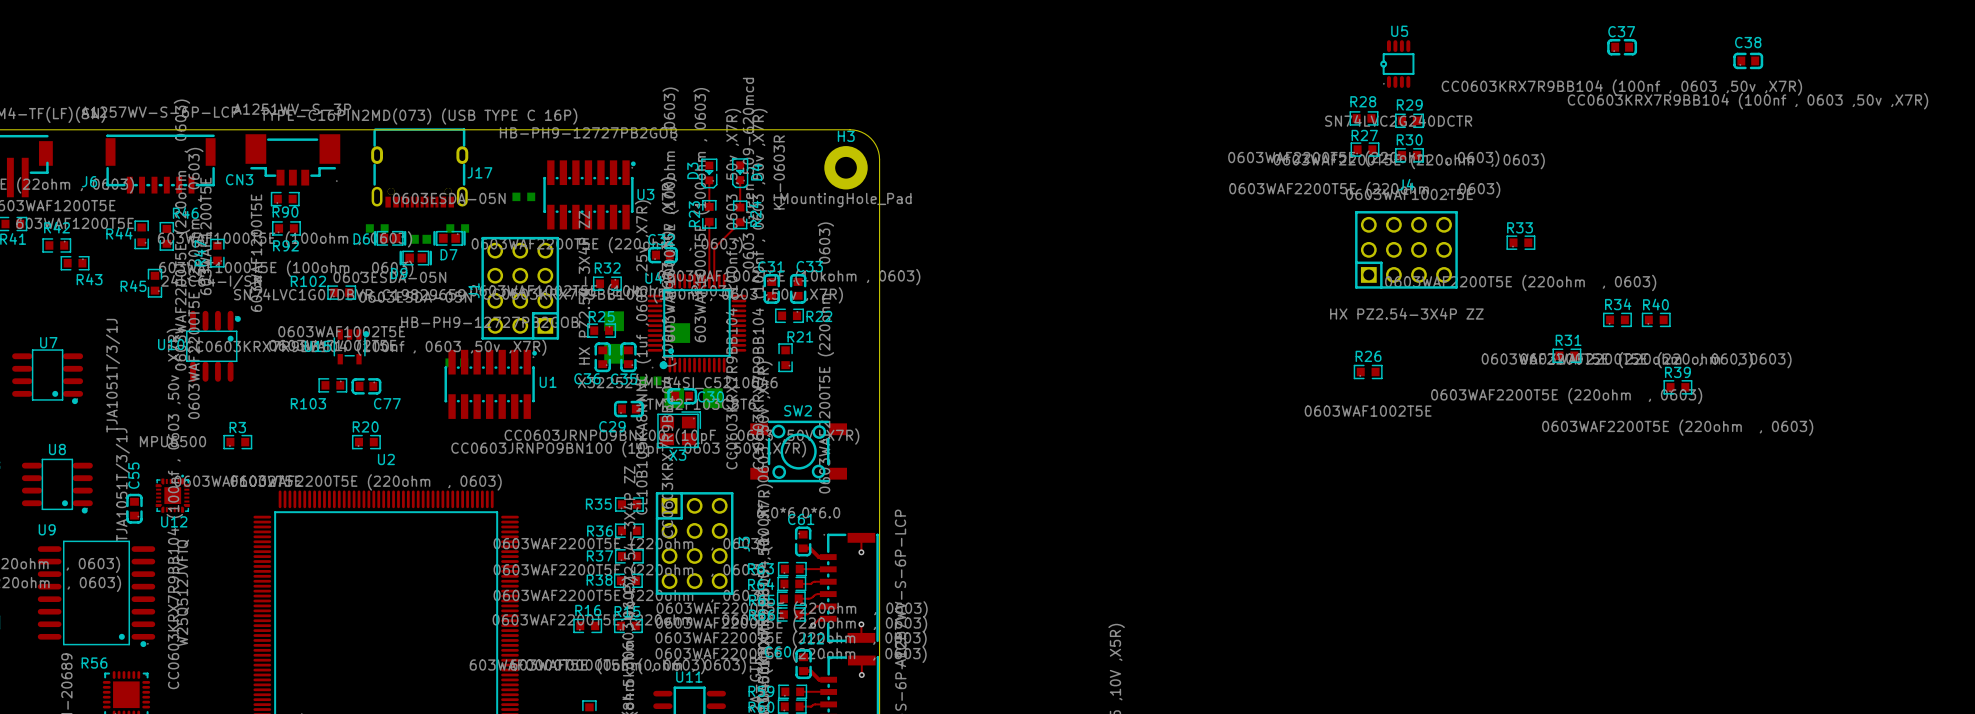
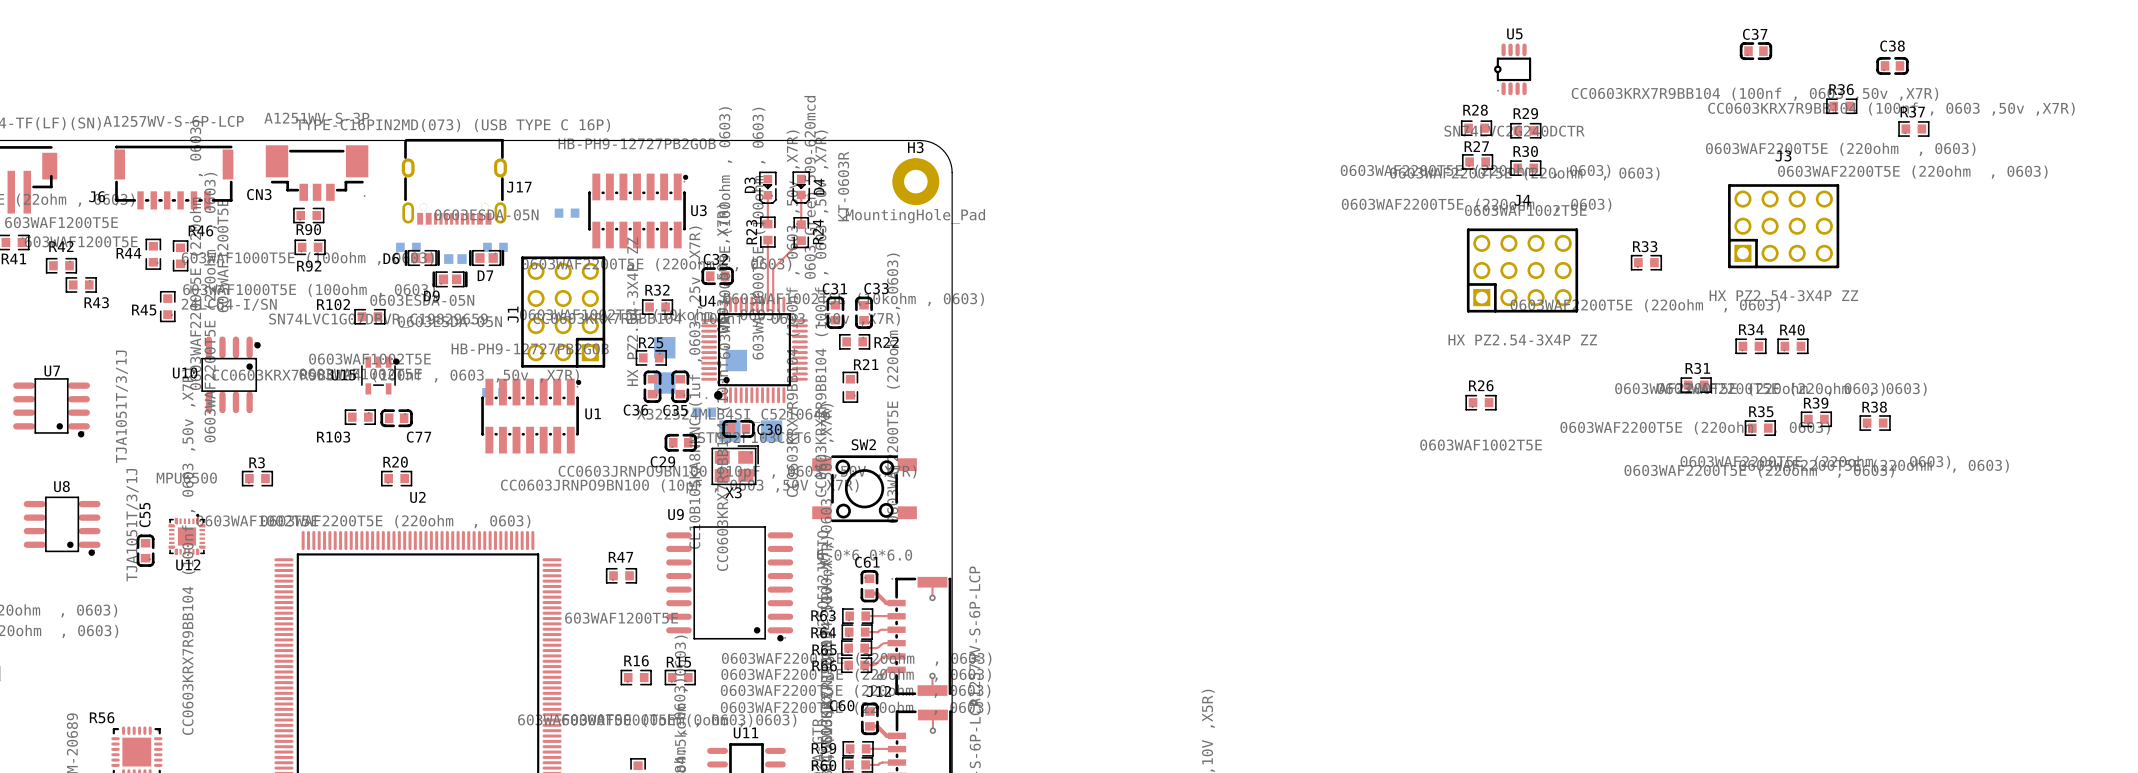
R47 rotation: 0° (217, 253) -> 90° clockwise (621, 575)
R47 position: (217, 253) -> (621, 575)
R35 name position: R35 (598, 504) -> R35 (1761, 411)
R35 position: (629, 504) -> (1760, 428)
R36 position: (629, 530) -> (1841, 106)
R36 name position: R36 (600, 531) -> R36 (1841, 89)
J3 rotation: 0° (694, 543) -> 90° counterclockwise (1783, 226)
J3 position: (694, 543) -> (1783, 226)
R37 name position: R37 (600, 555) -> R37 (1912, 112)
R37 position: (629, 556) -> (1913, 129)
R38 name position: R38 (599, 580) -> R38 (1874, 407)
R38 position: (628, 580) -> (1875, 423)
U9 position: (96, 593) -> (729, 583)

